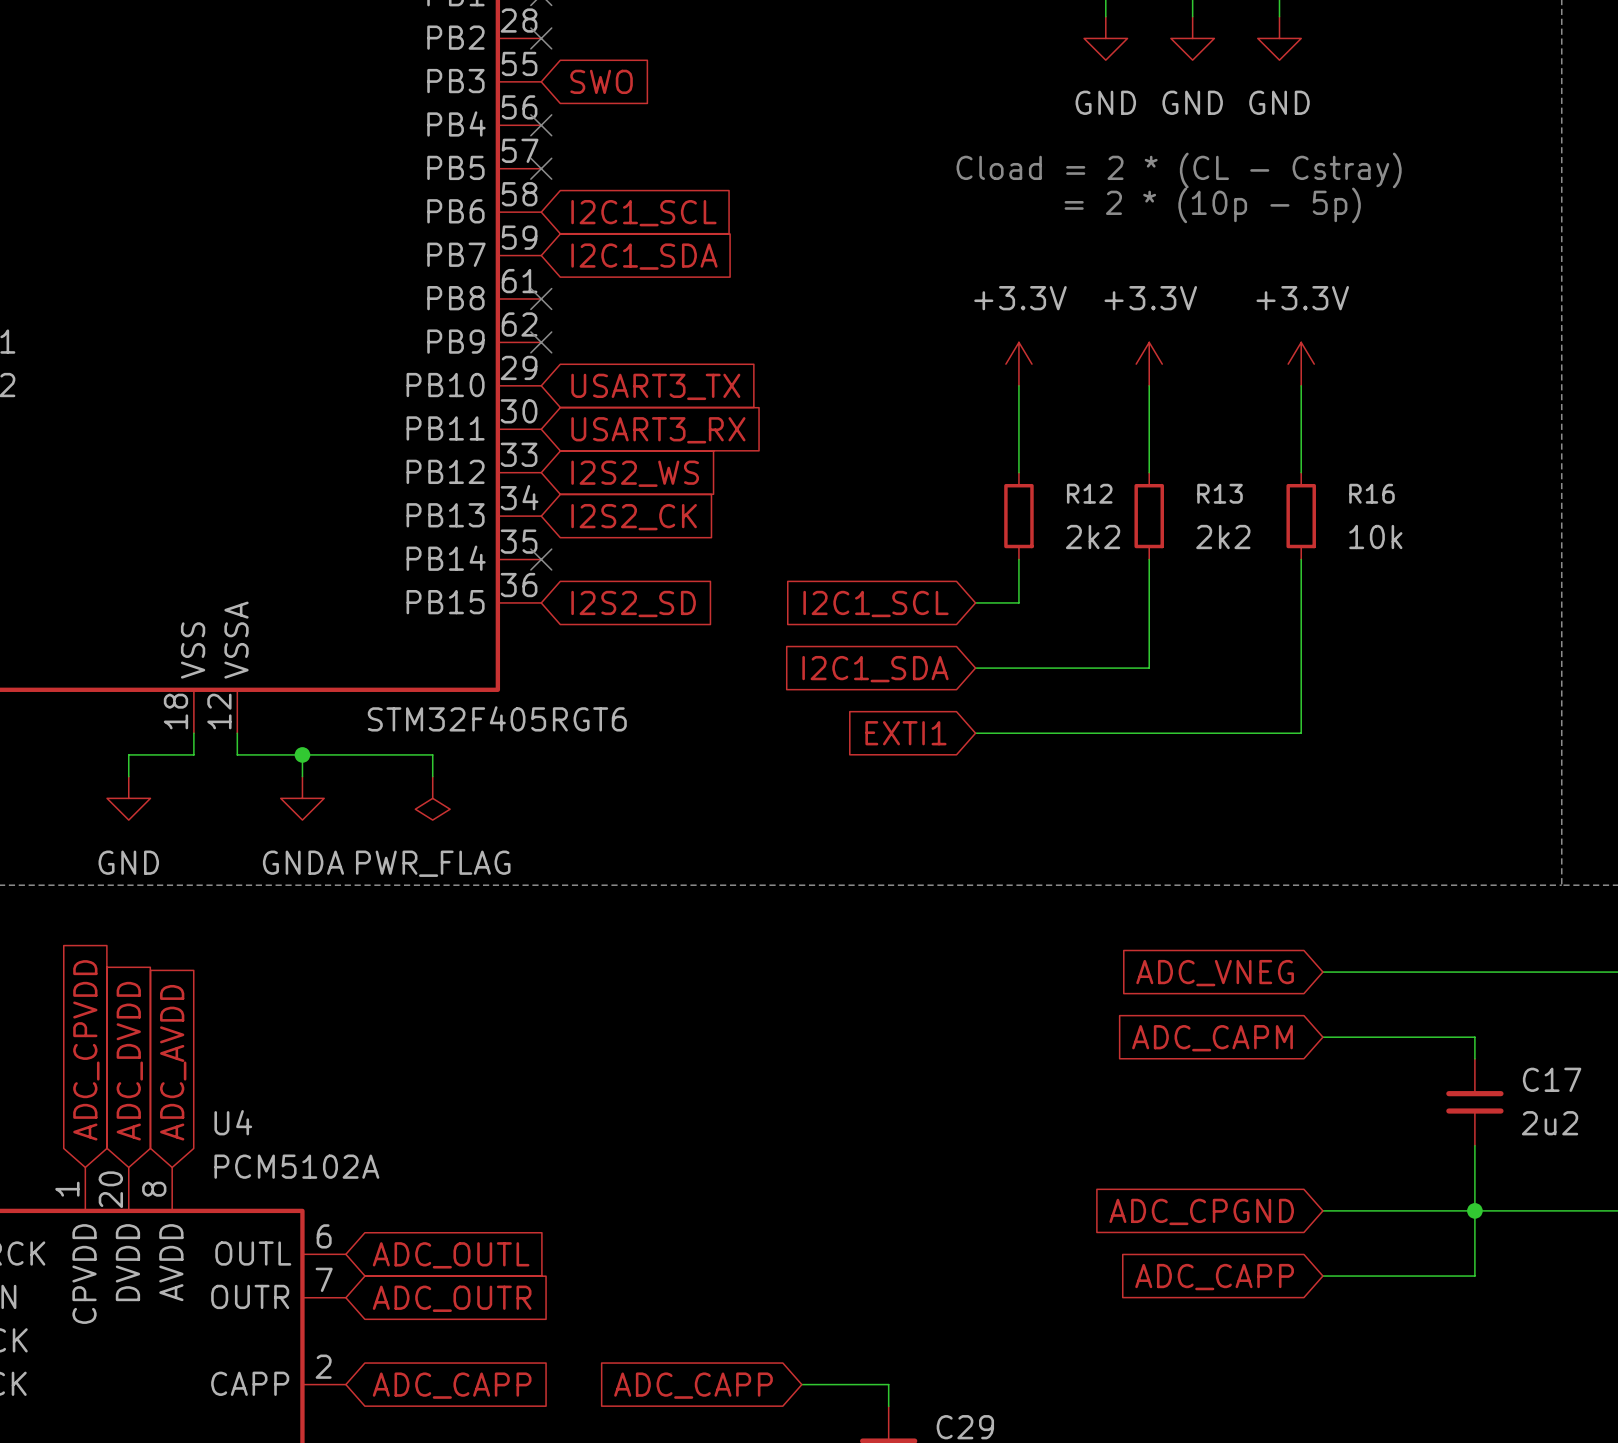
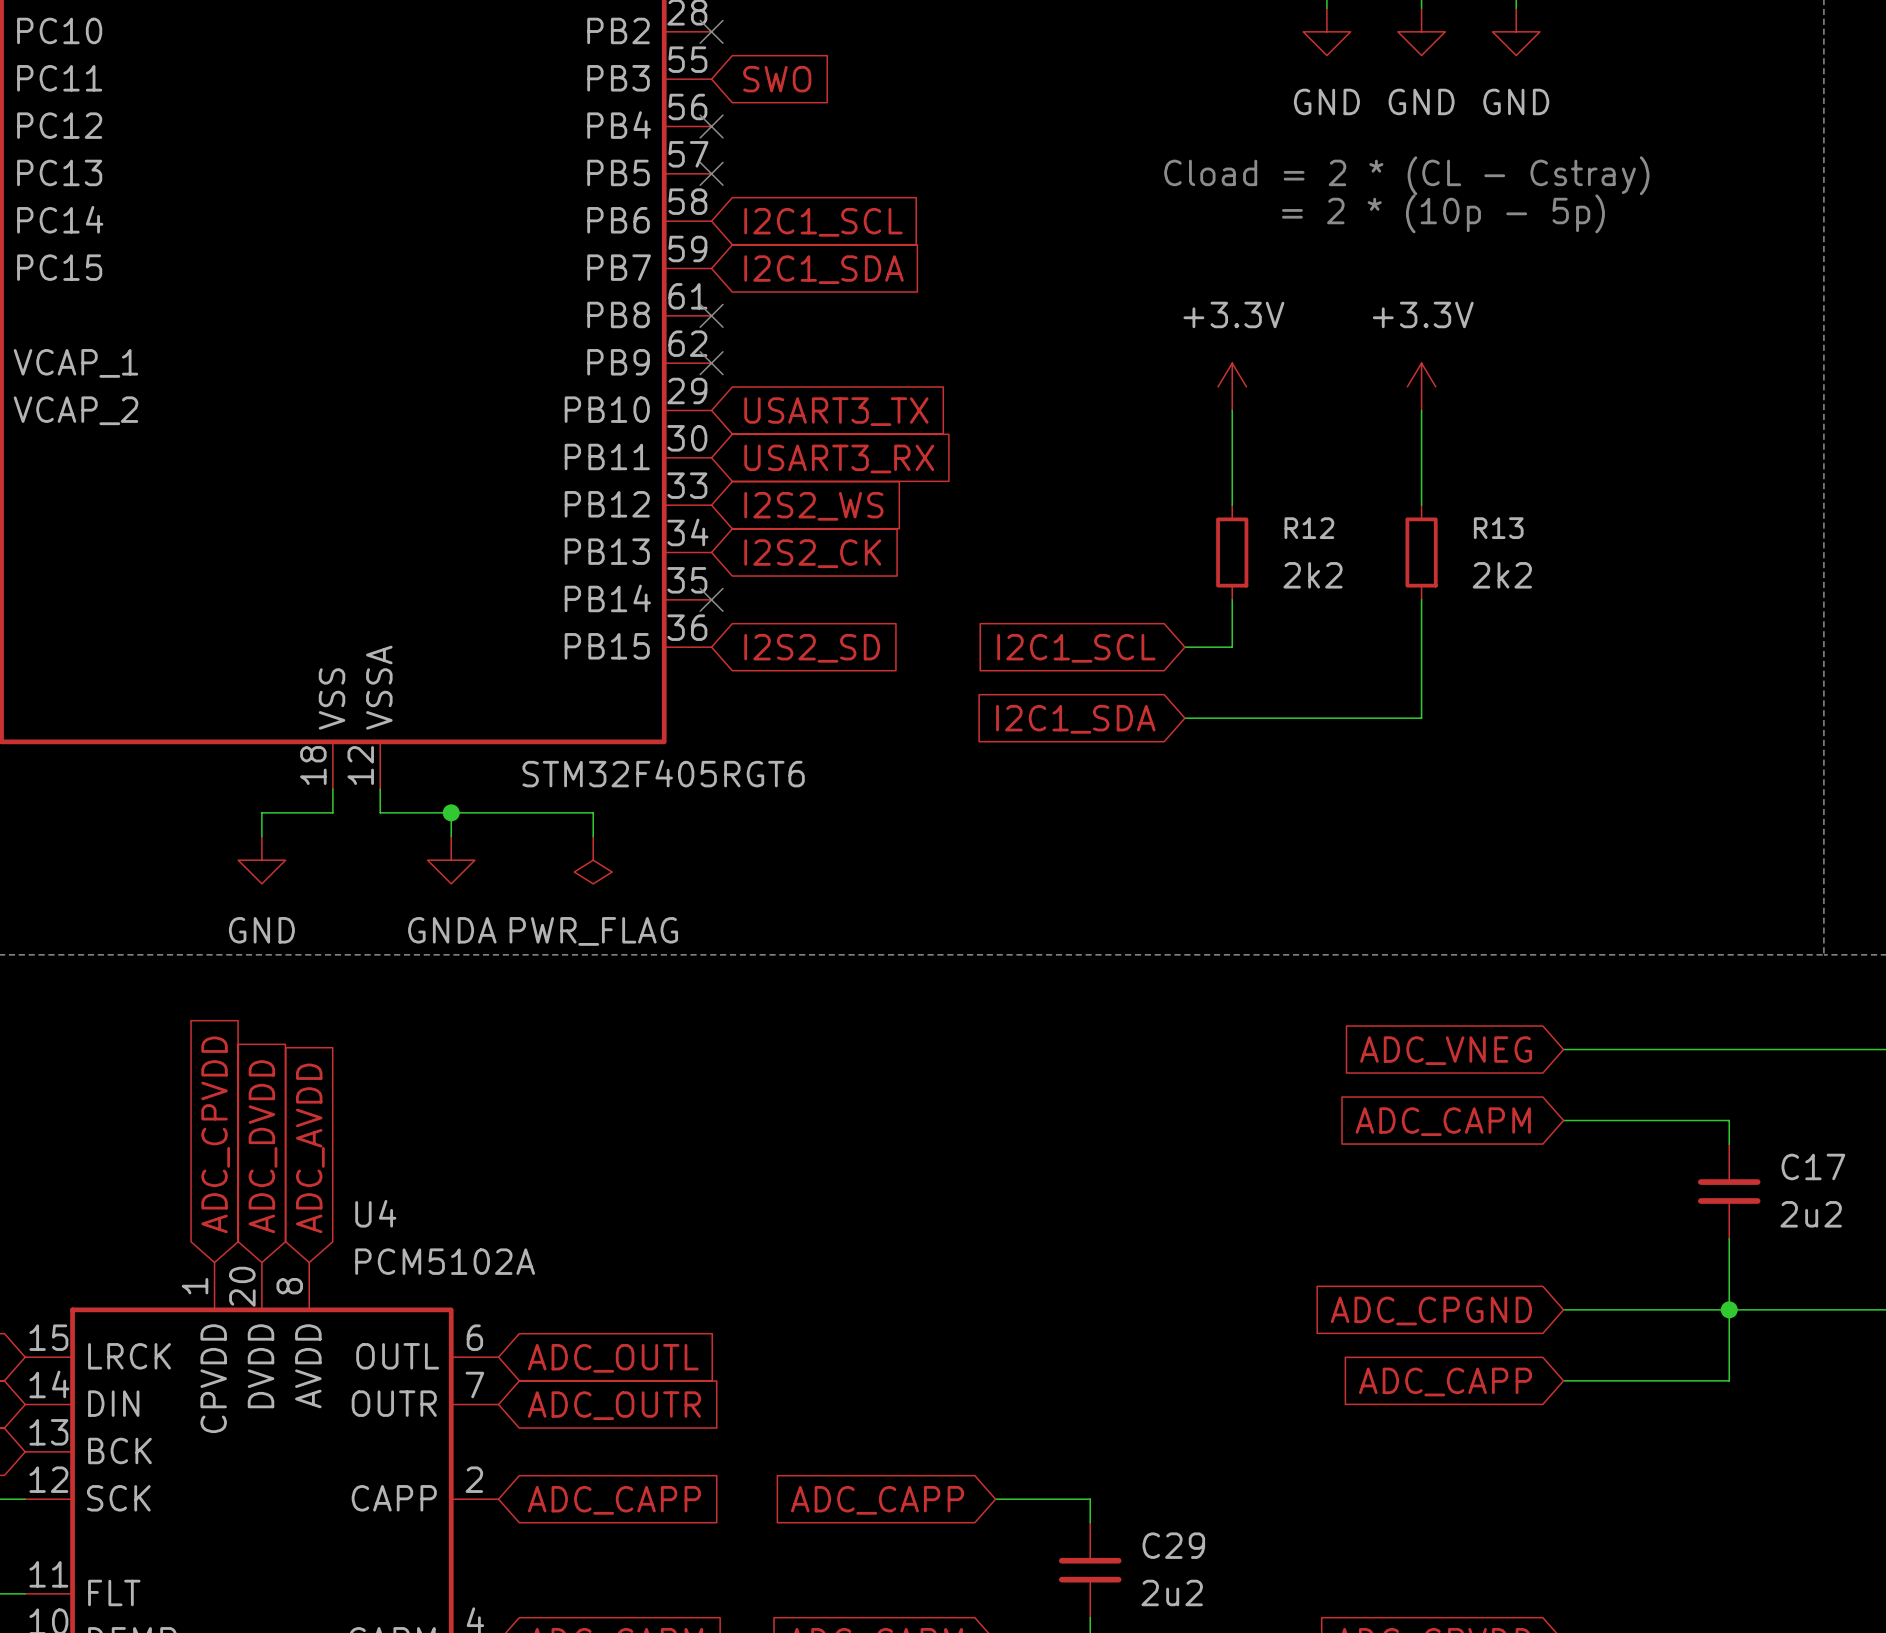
power symbol position: +3.3V (1149, 364) -> +3.3V (1421, 386)
power symbol: +3.3V (1301, 364) -> none
wire: (1149, 385) (1149, 472) -> (1421, 410) (1421, 505)
wire: (1301, 385) (1301, 472) -> none
R13 position: (1149, 516) -> (1421, 552)
R16: 10k (1301, 516) -> none
wire: (1149, 559) (1149, 668) -> (1421, 599) (1421, 718) (1374, 718)
wire: (1301, 559) (1301, 733) (975, 733) -> none
global label: EXTI1 (905, 733) -> none

